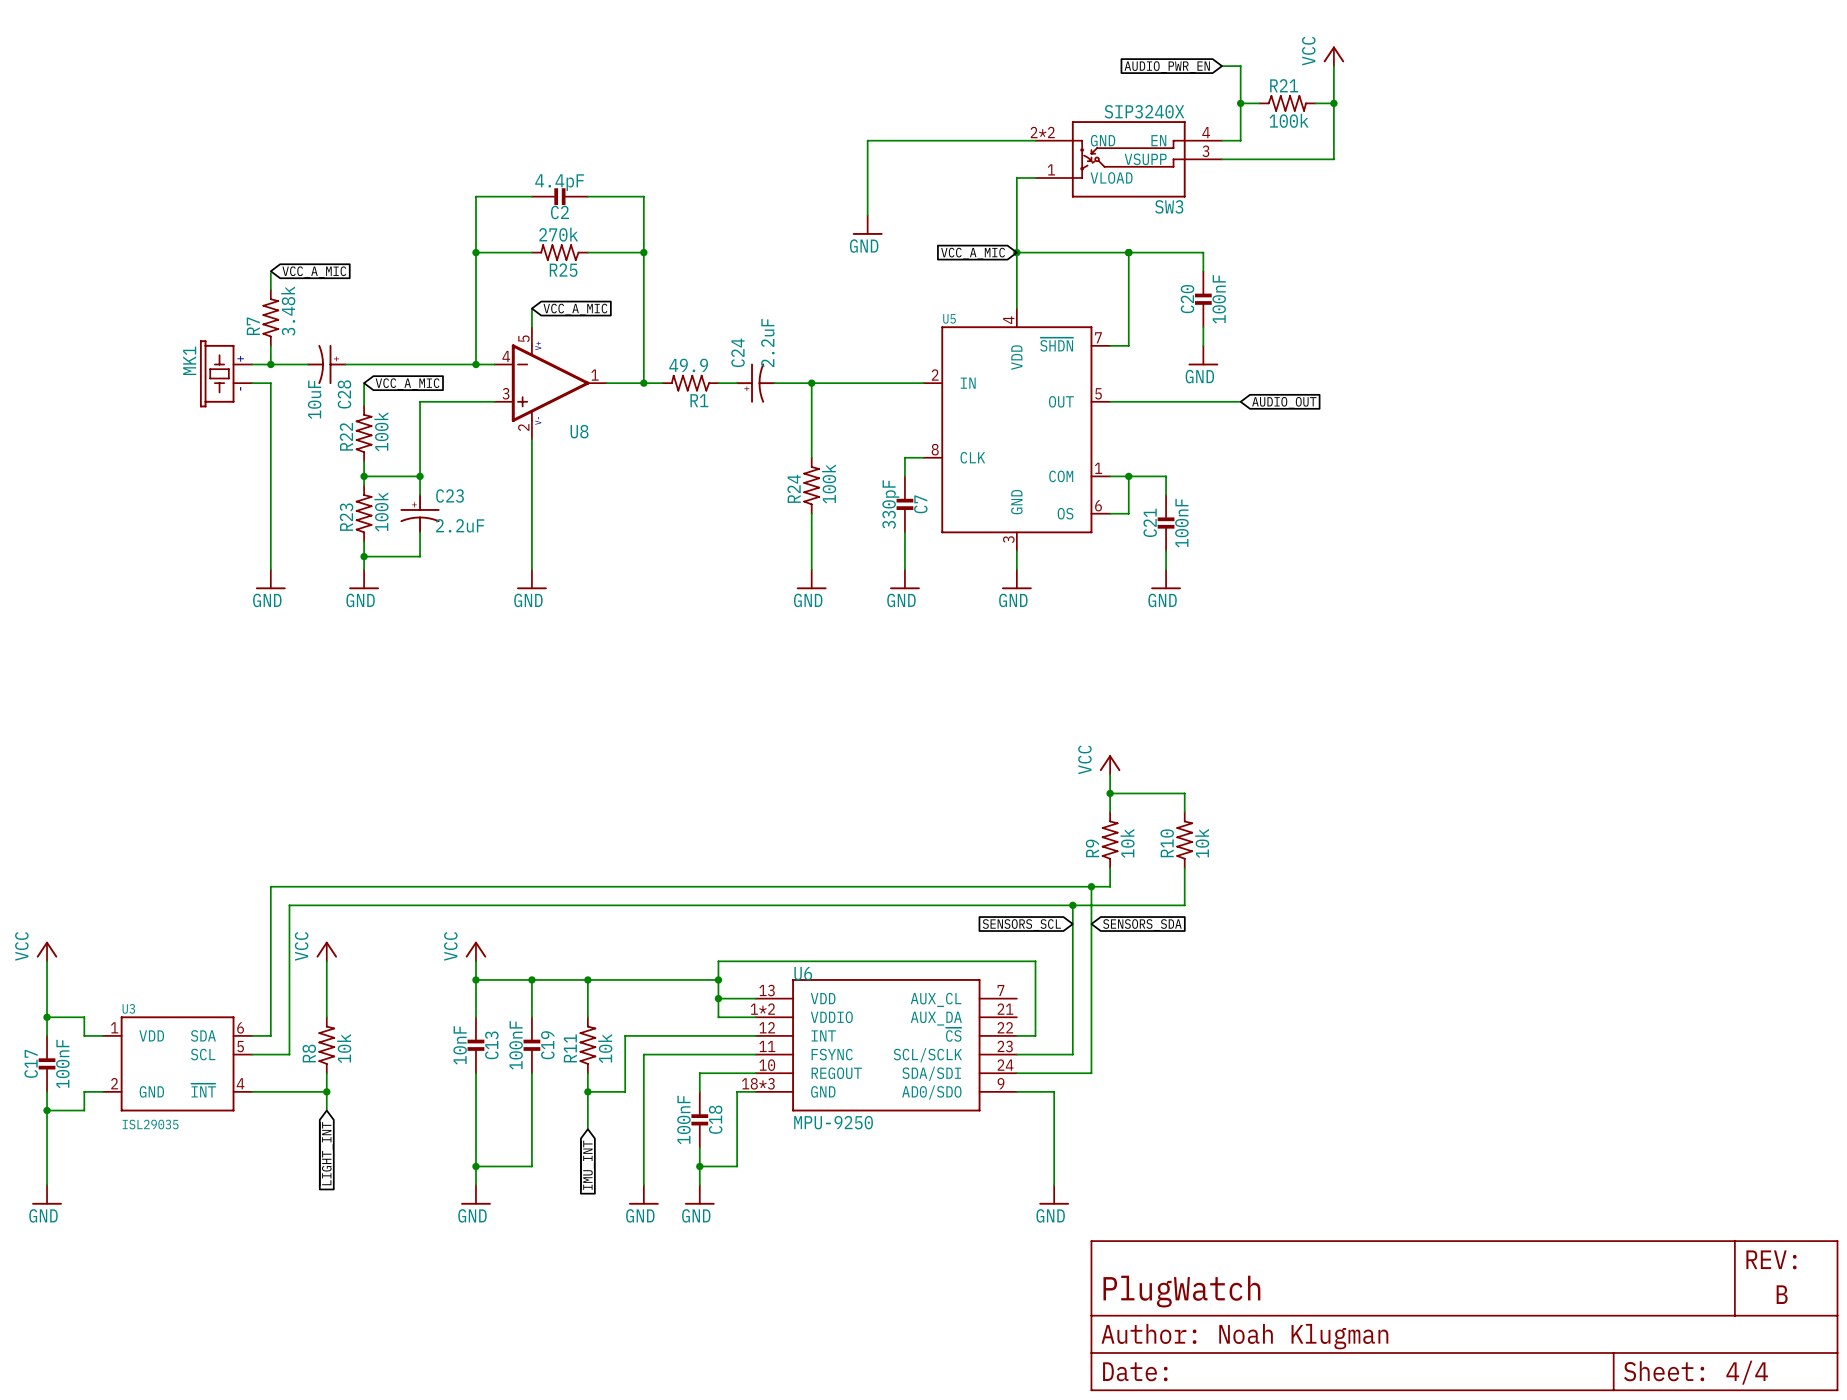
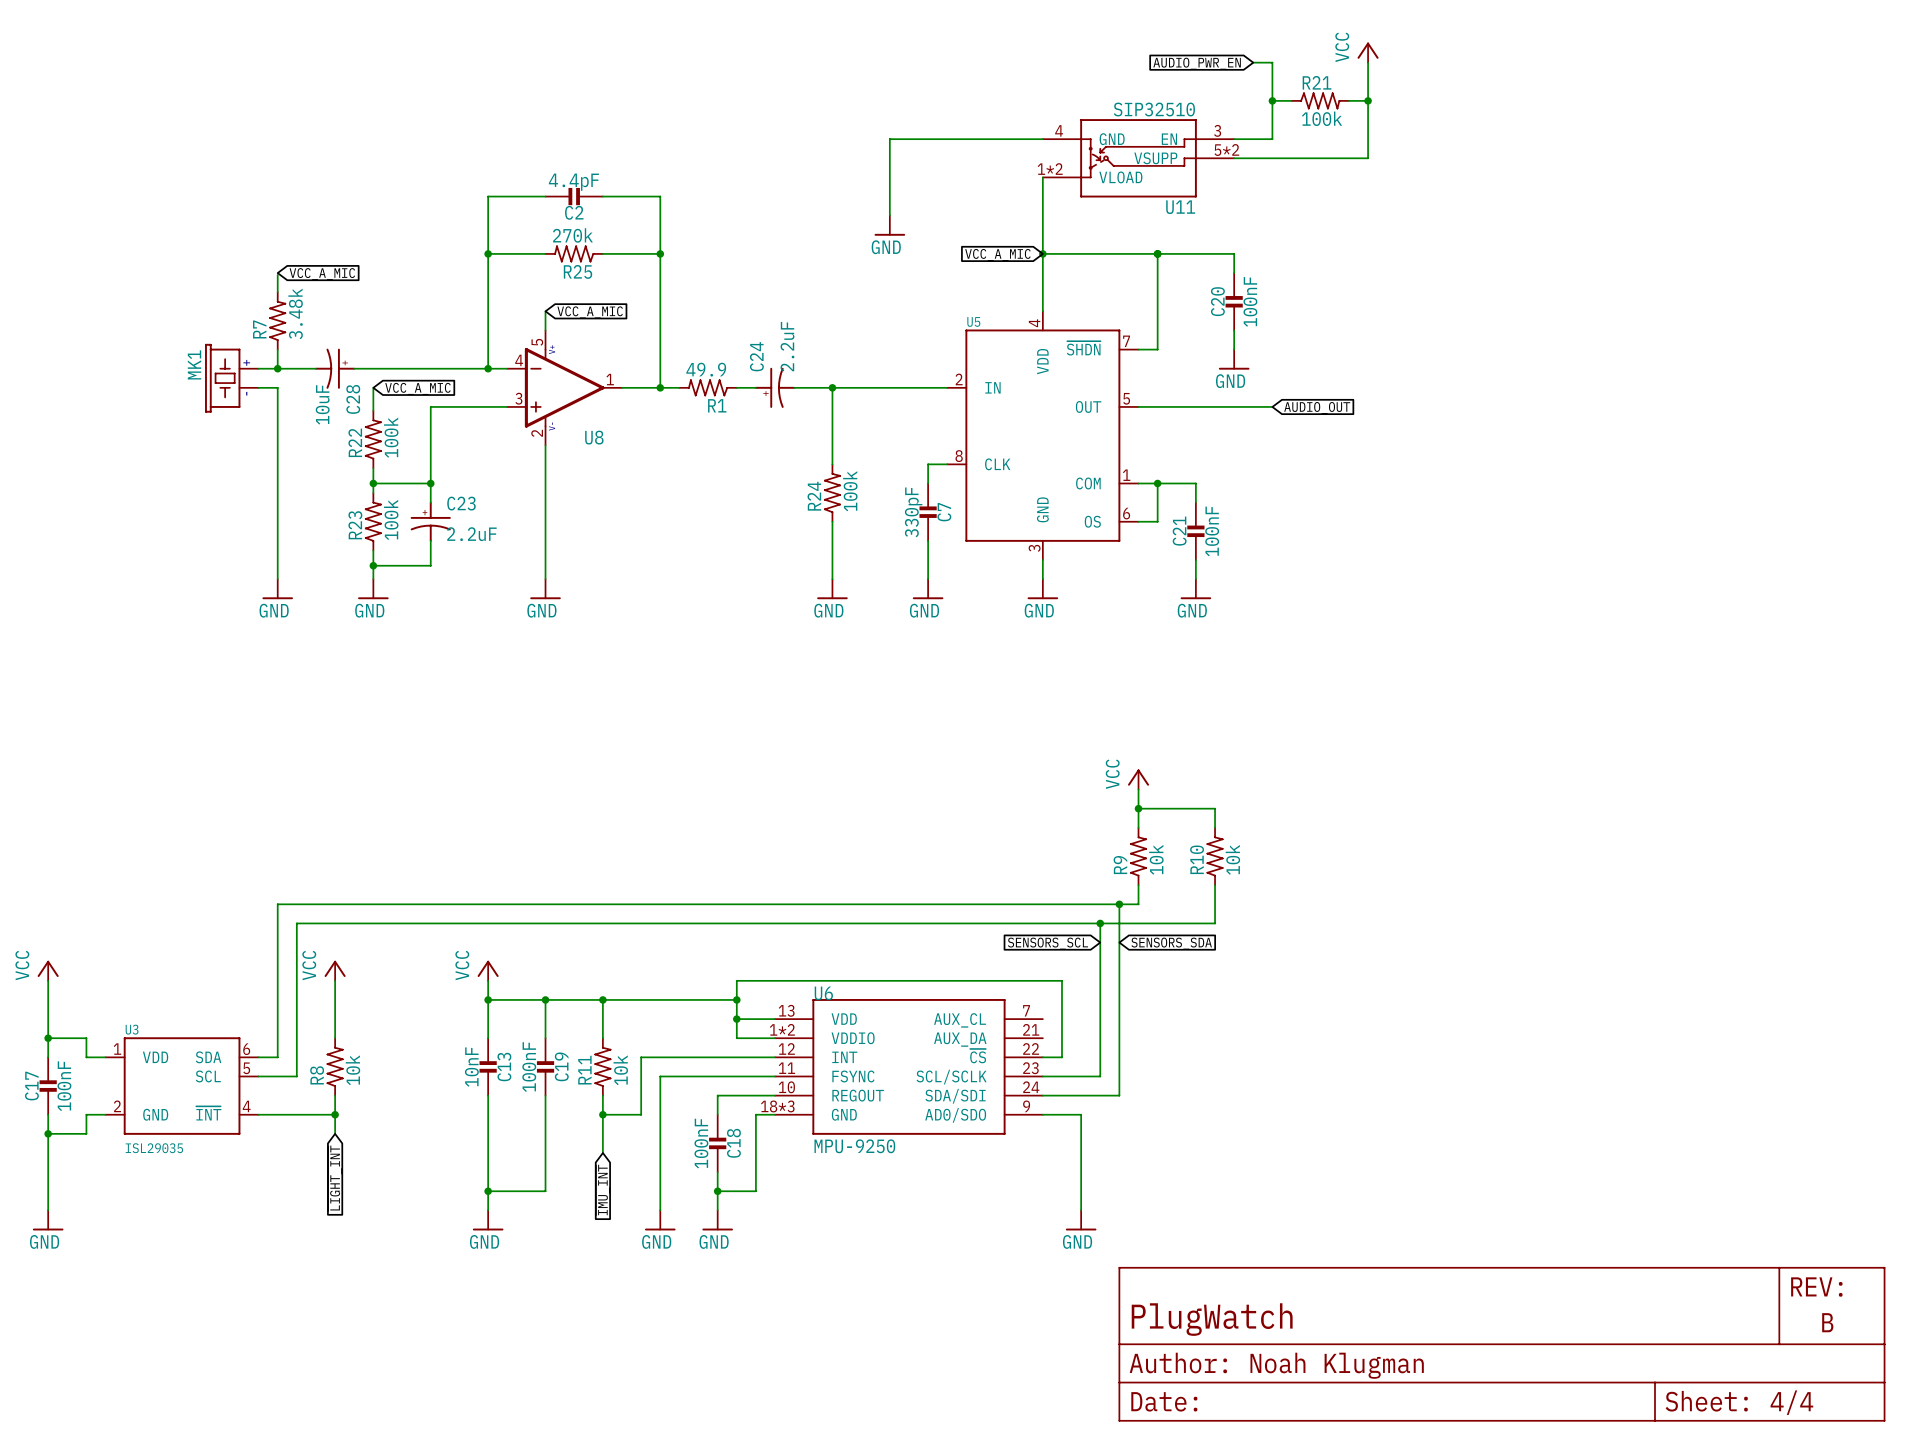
U11: none -> SIP32510 (1138, 158)
SW3: SIP3240X (1128, 159) -> none

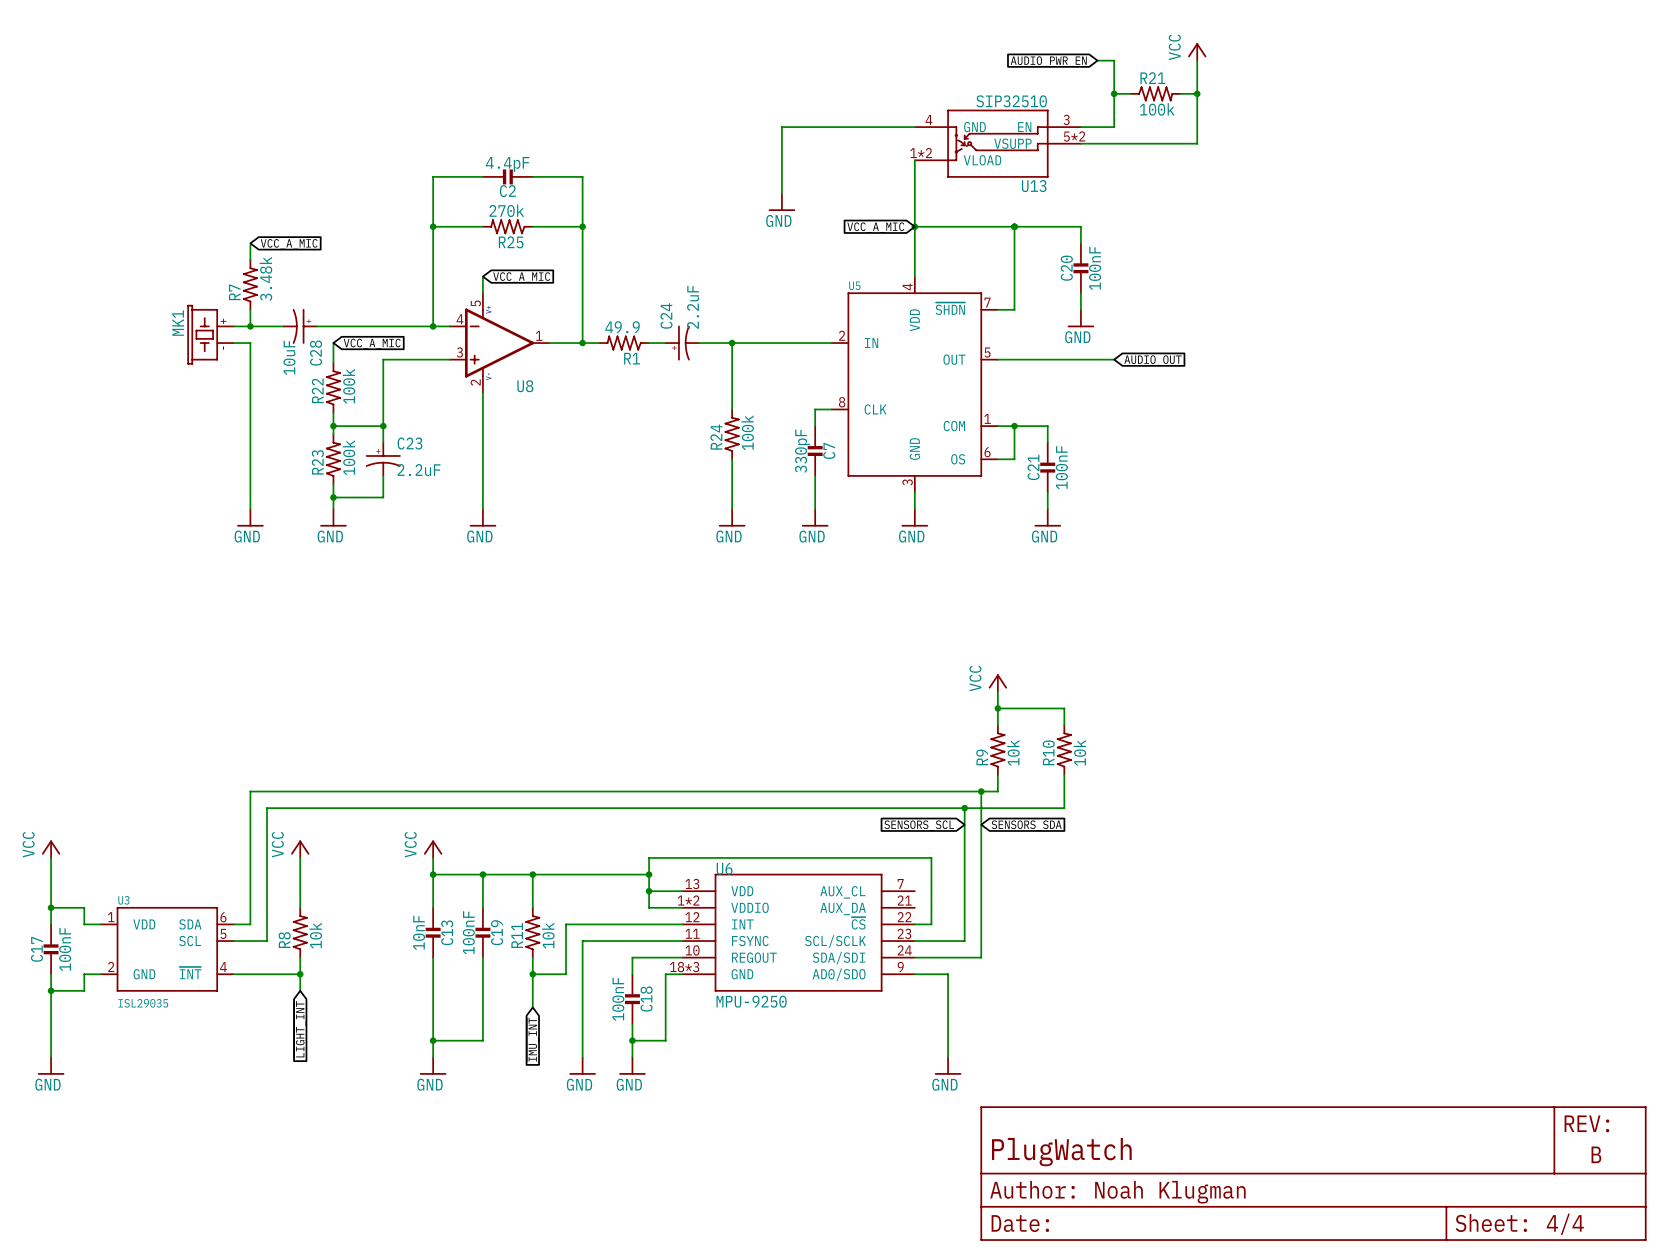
U11 name: U11 (1180, 207) -> U13 (1034, 186)

